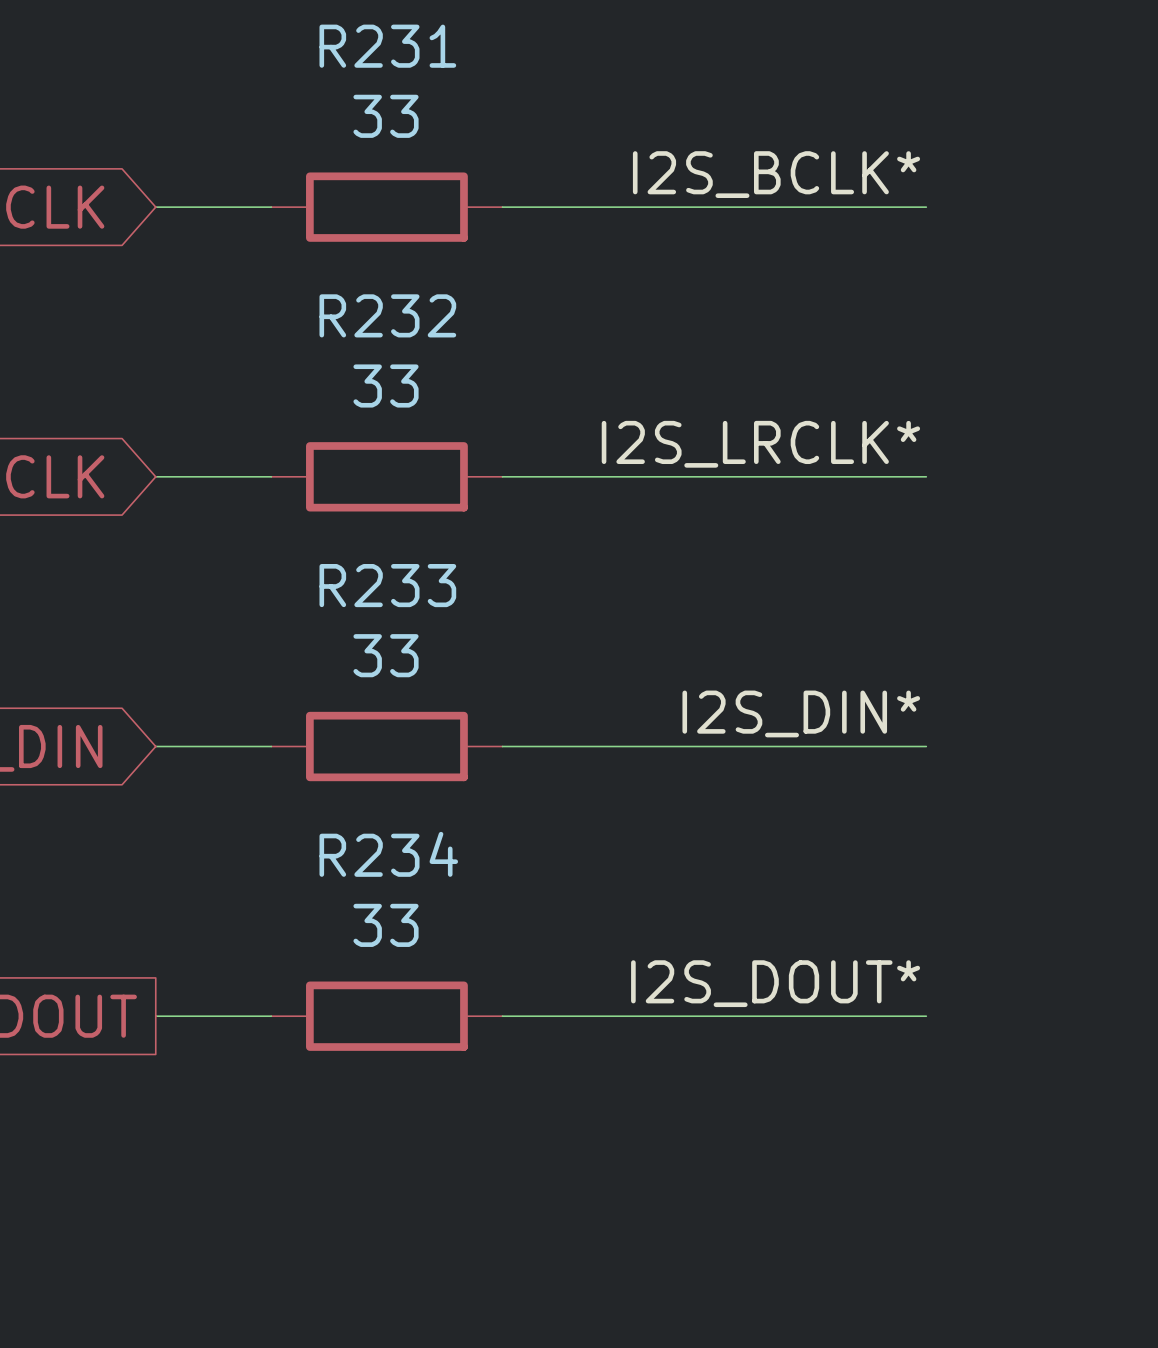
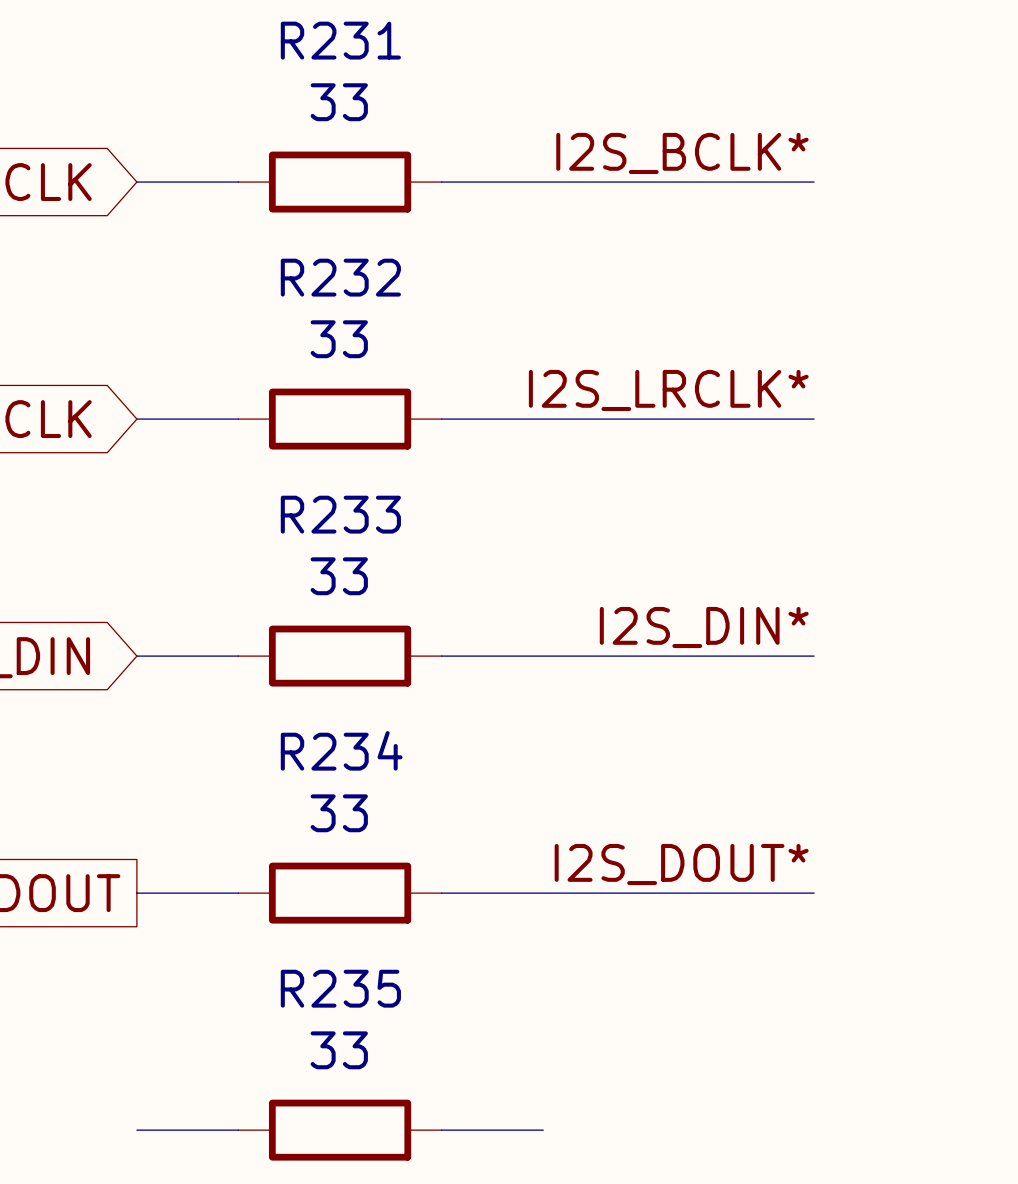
wire: none -> (136, 1130) (238, 1130)
R235: none -> 33 (340, 1130)
wire: none -> (441, 1130) (543, 1130)

